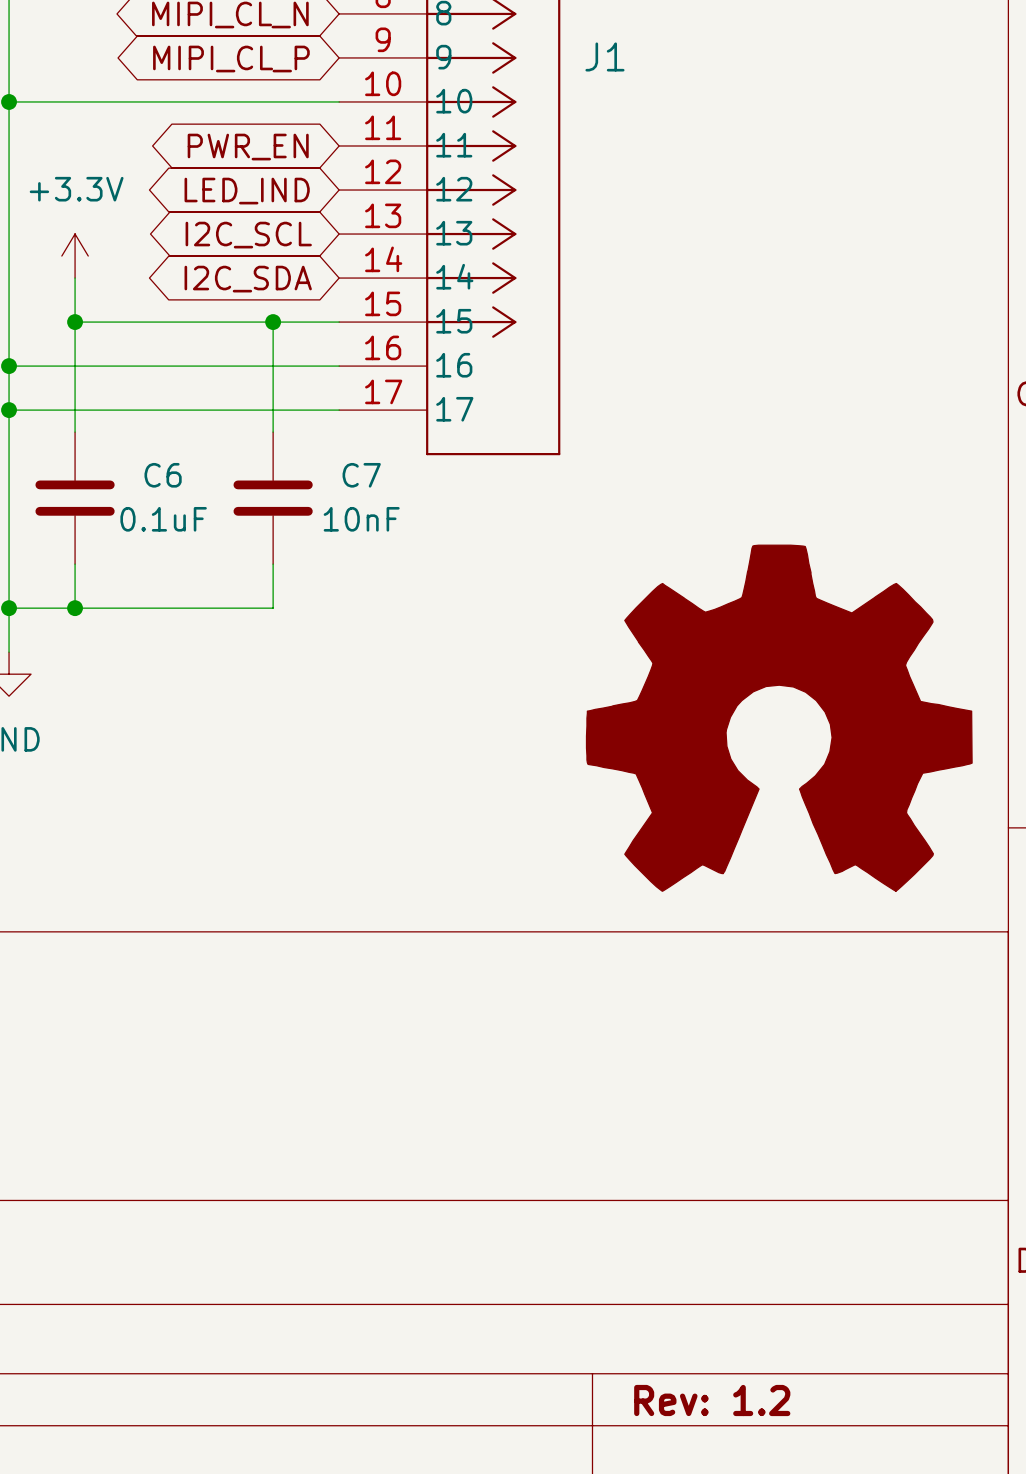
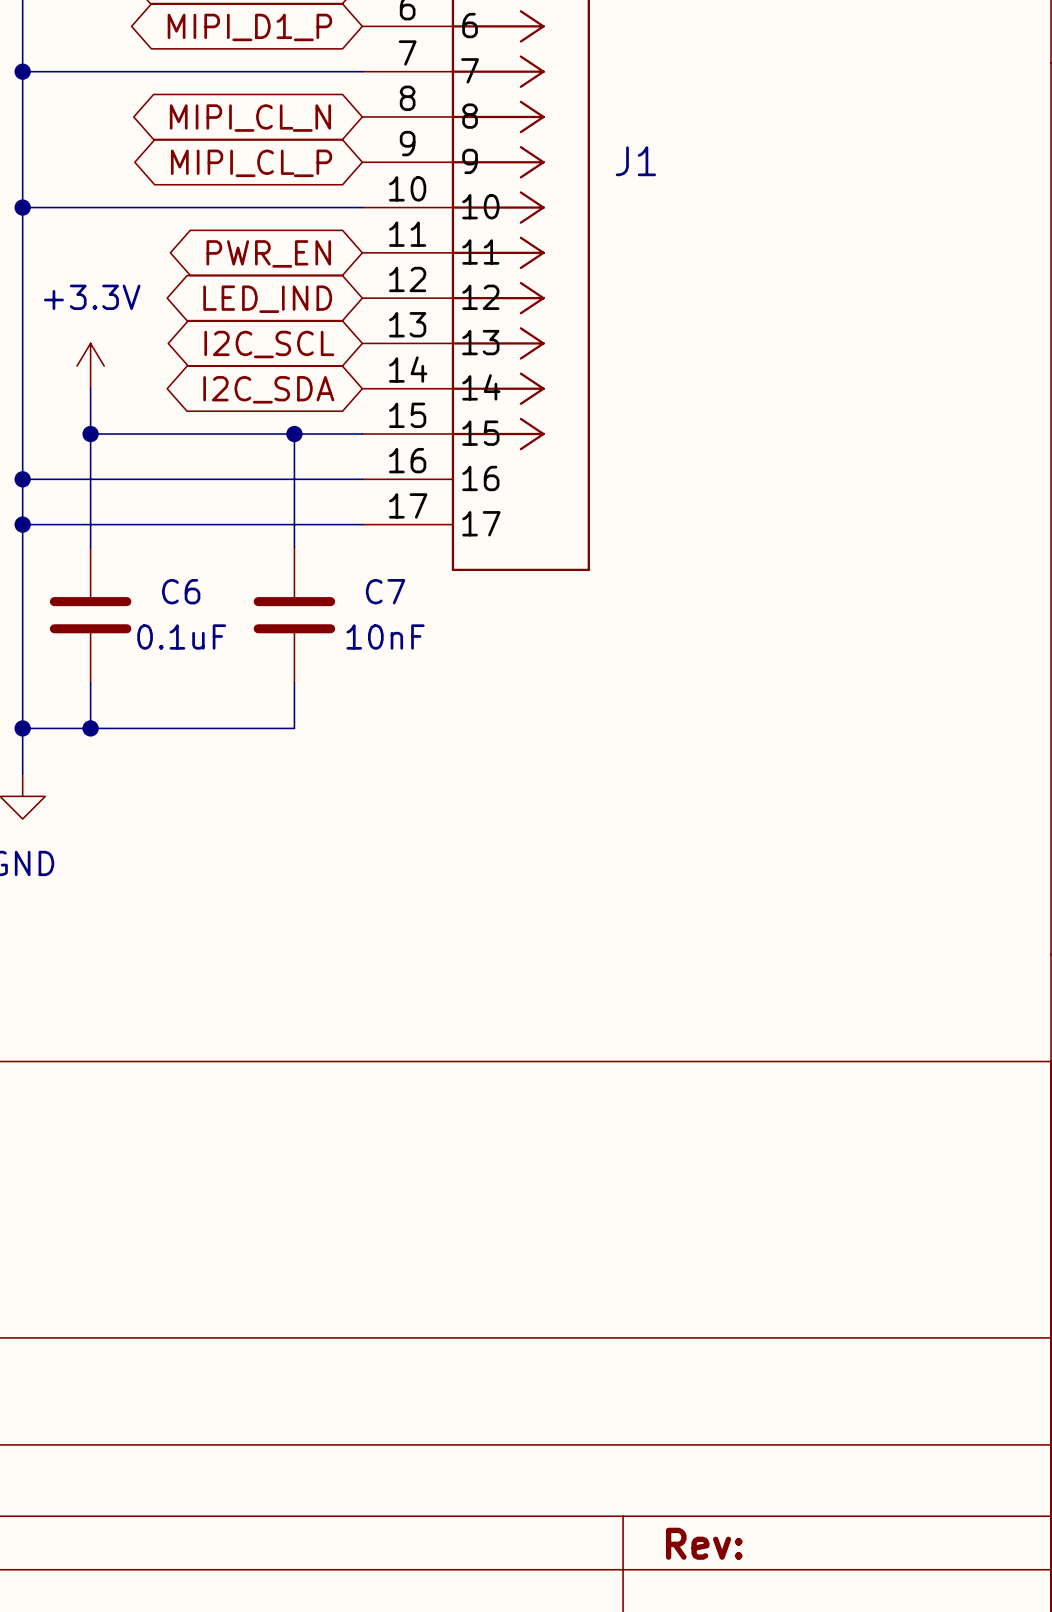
power symbol: (779, 718) -> none
title block: Rev: 1.2 (712, 1400) -> Rev: (704, 1543)

